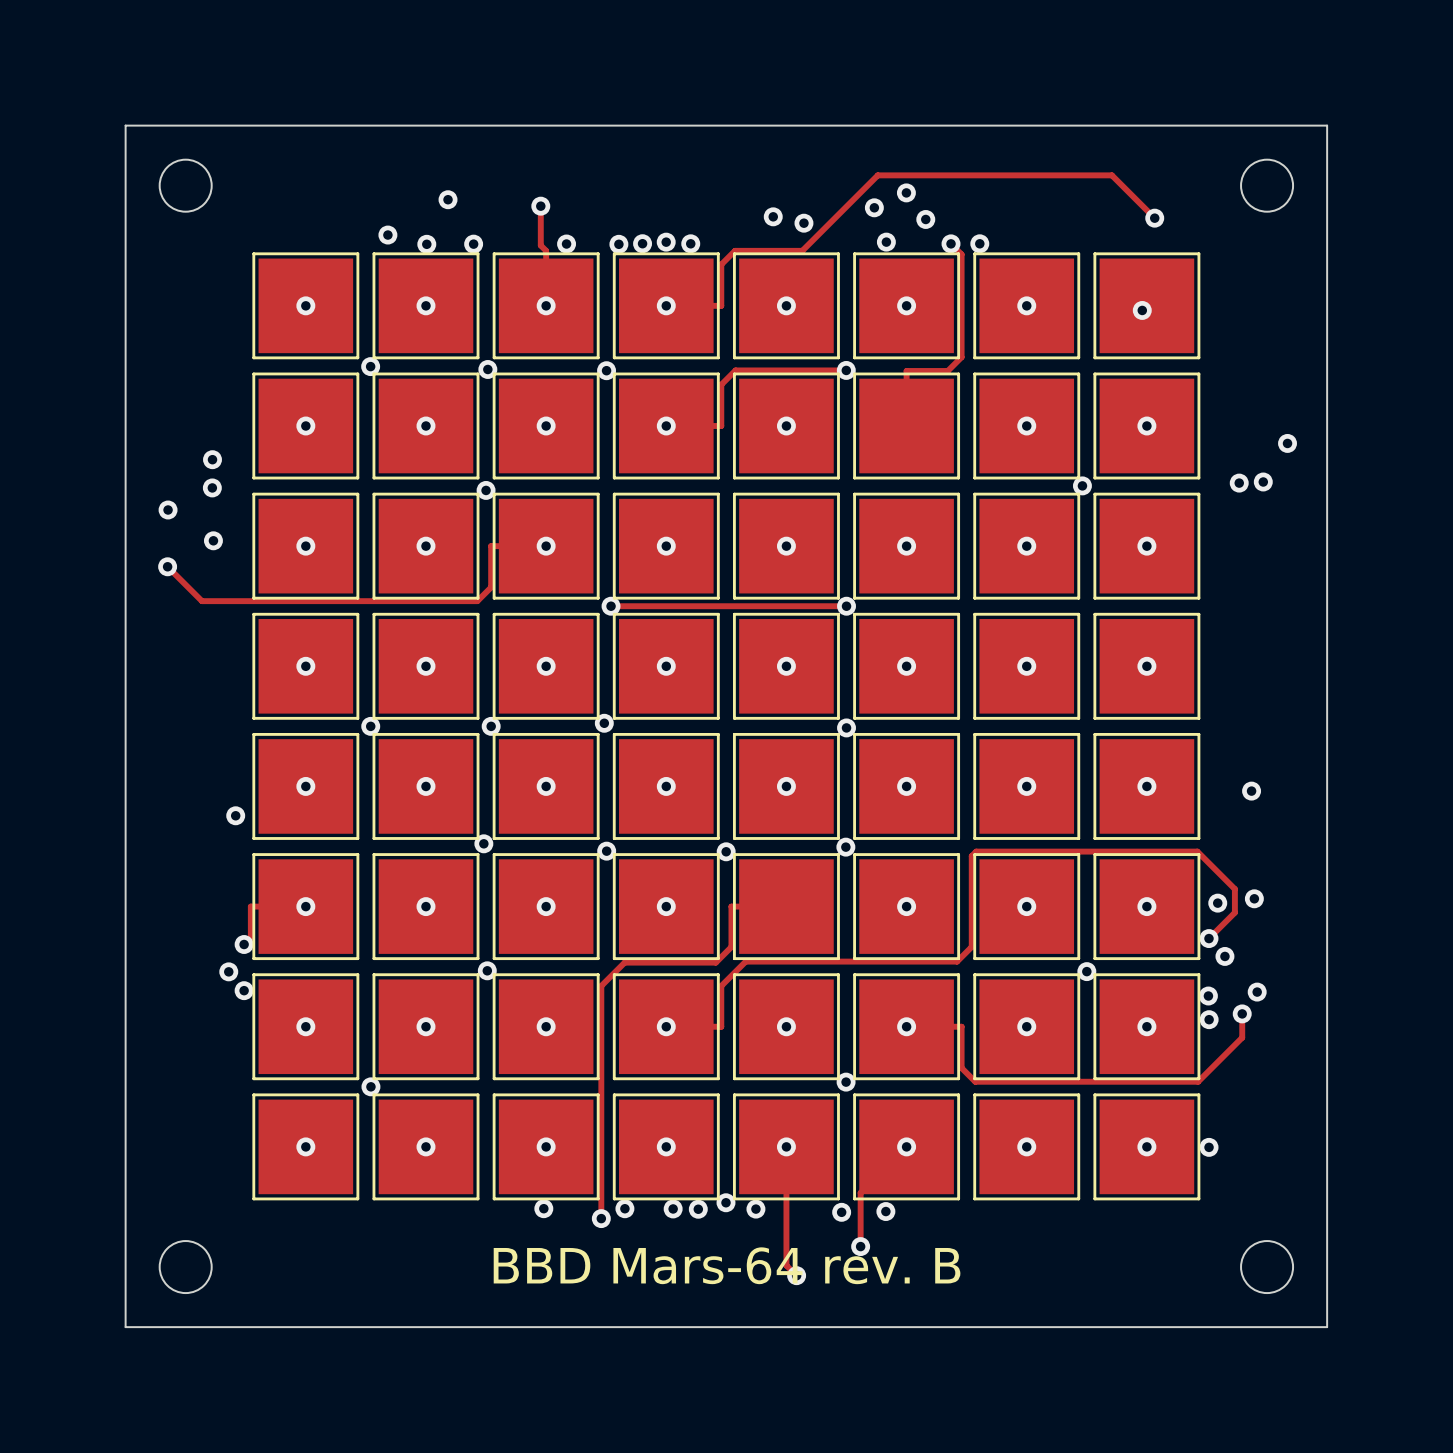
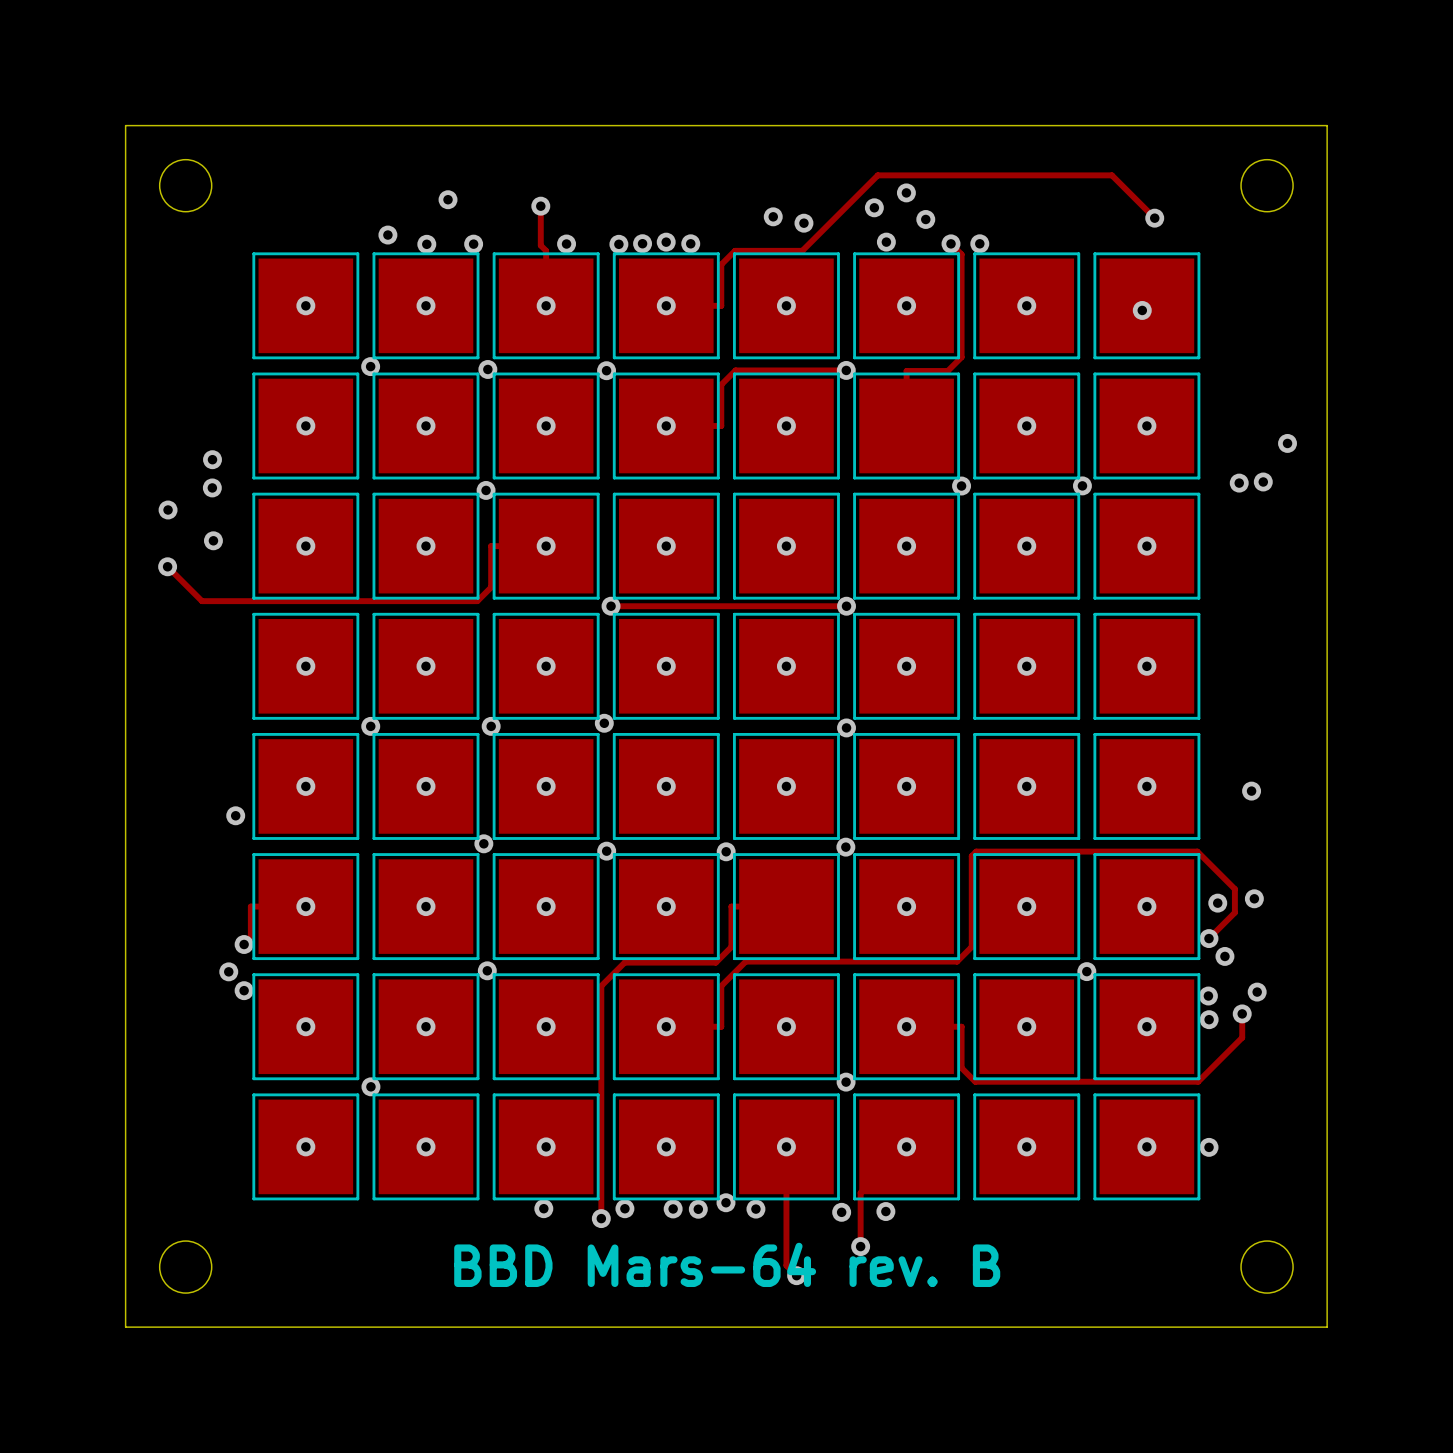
via: none -> (961, 486)

